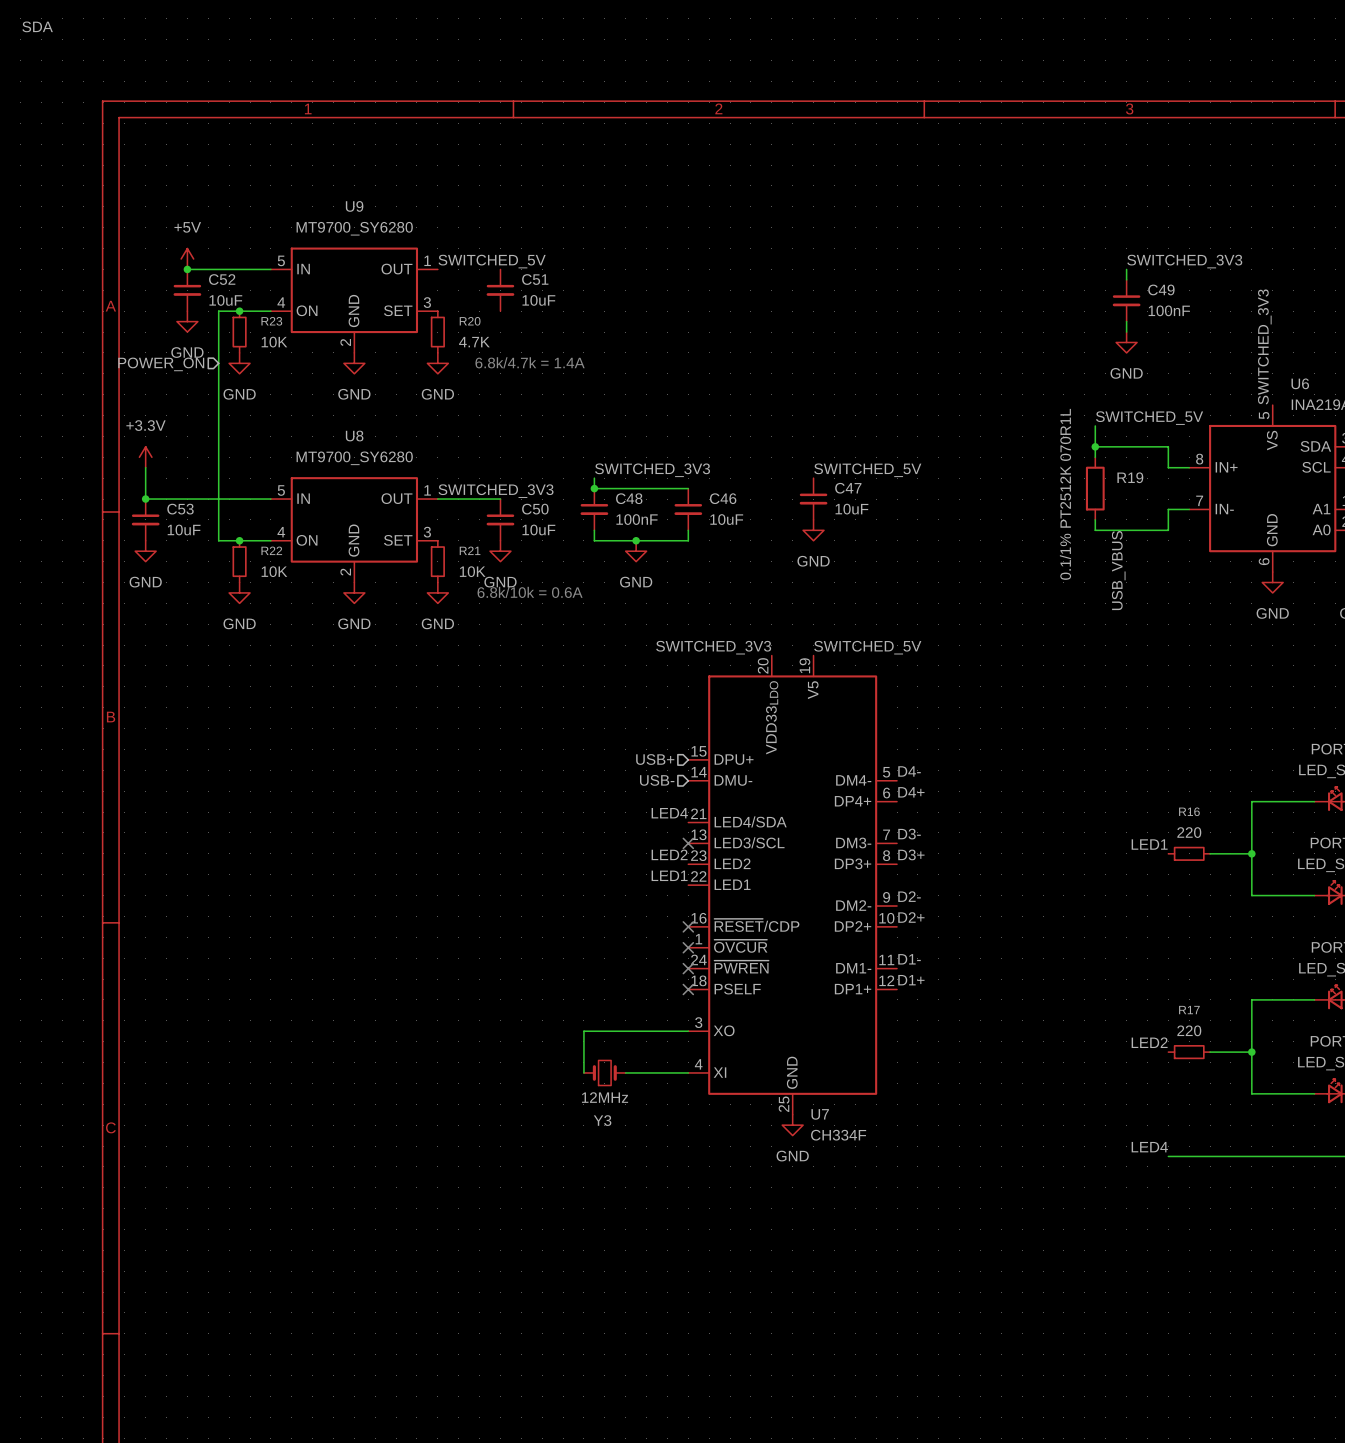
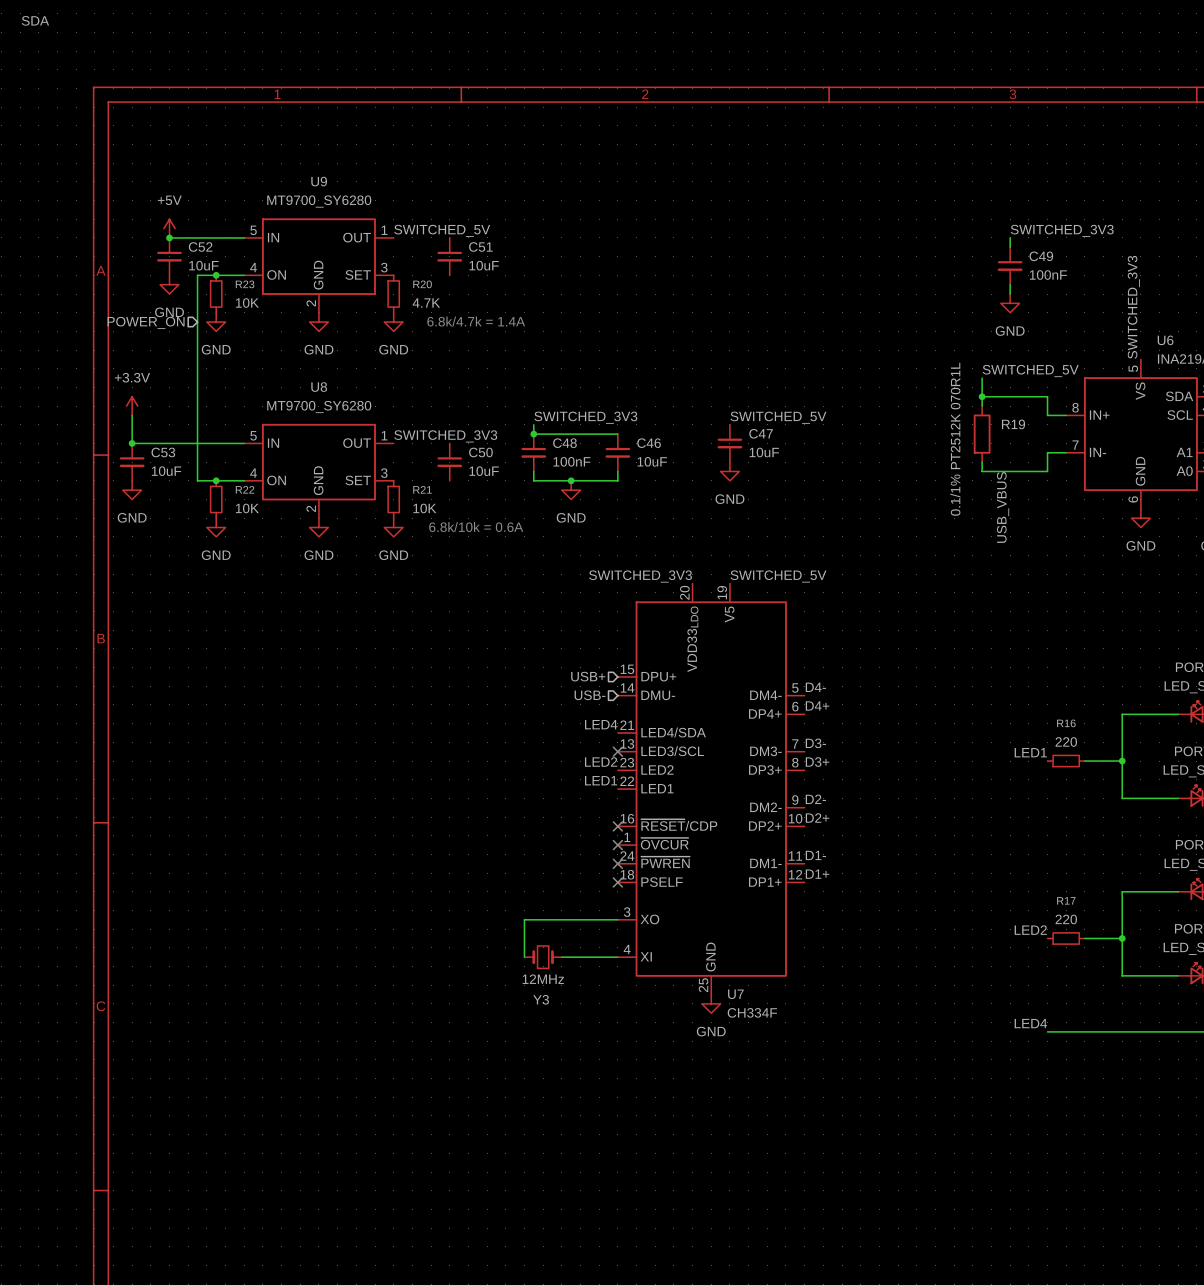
wire: (437, 499) (500, 499) -> none
power symbol: GND (500, 551) -> none

